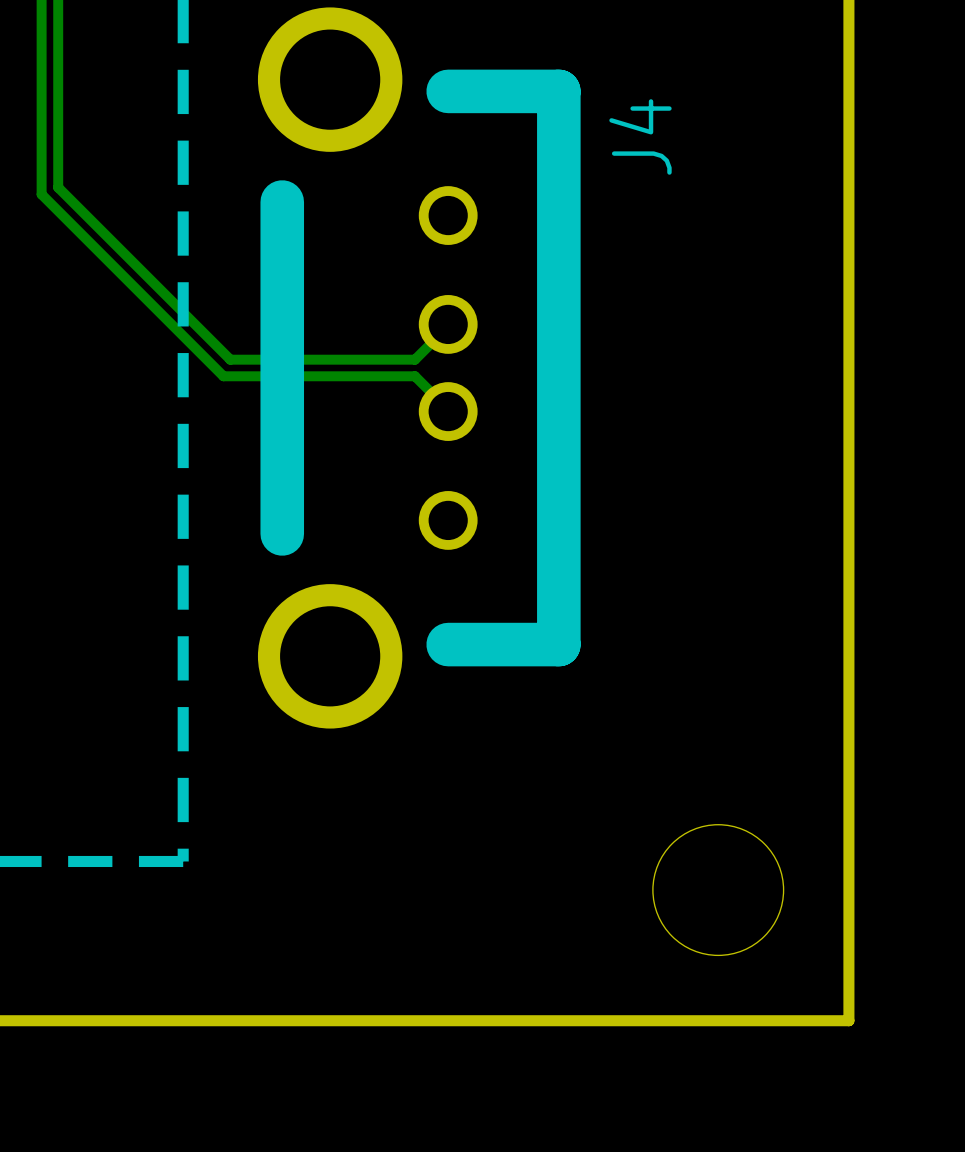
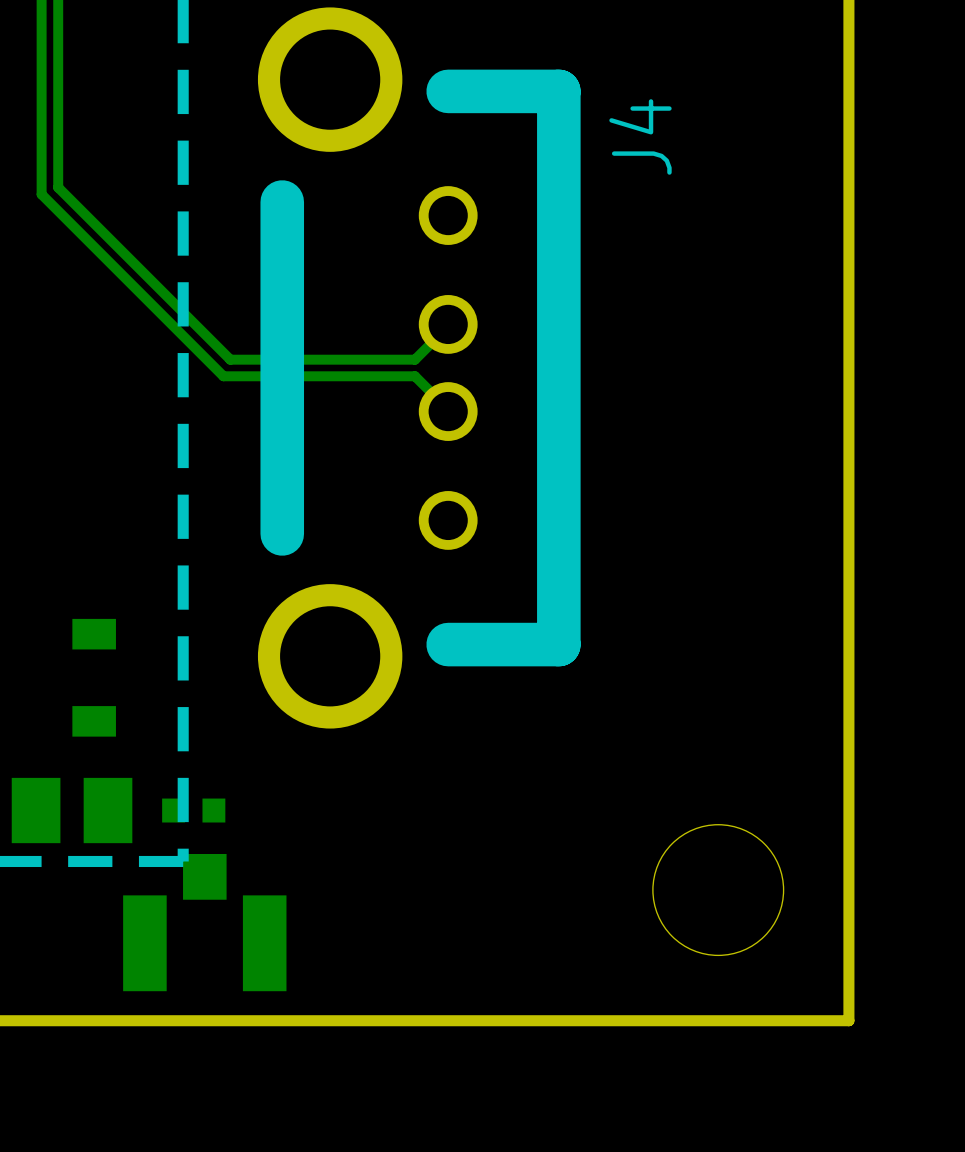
part: none -> (94, 677)
part: none -> (72, 810)
part: none -> (193, 810)
part: none -> (204, 922)

